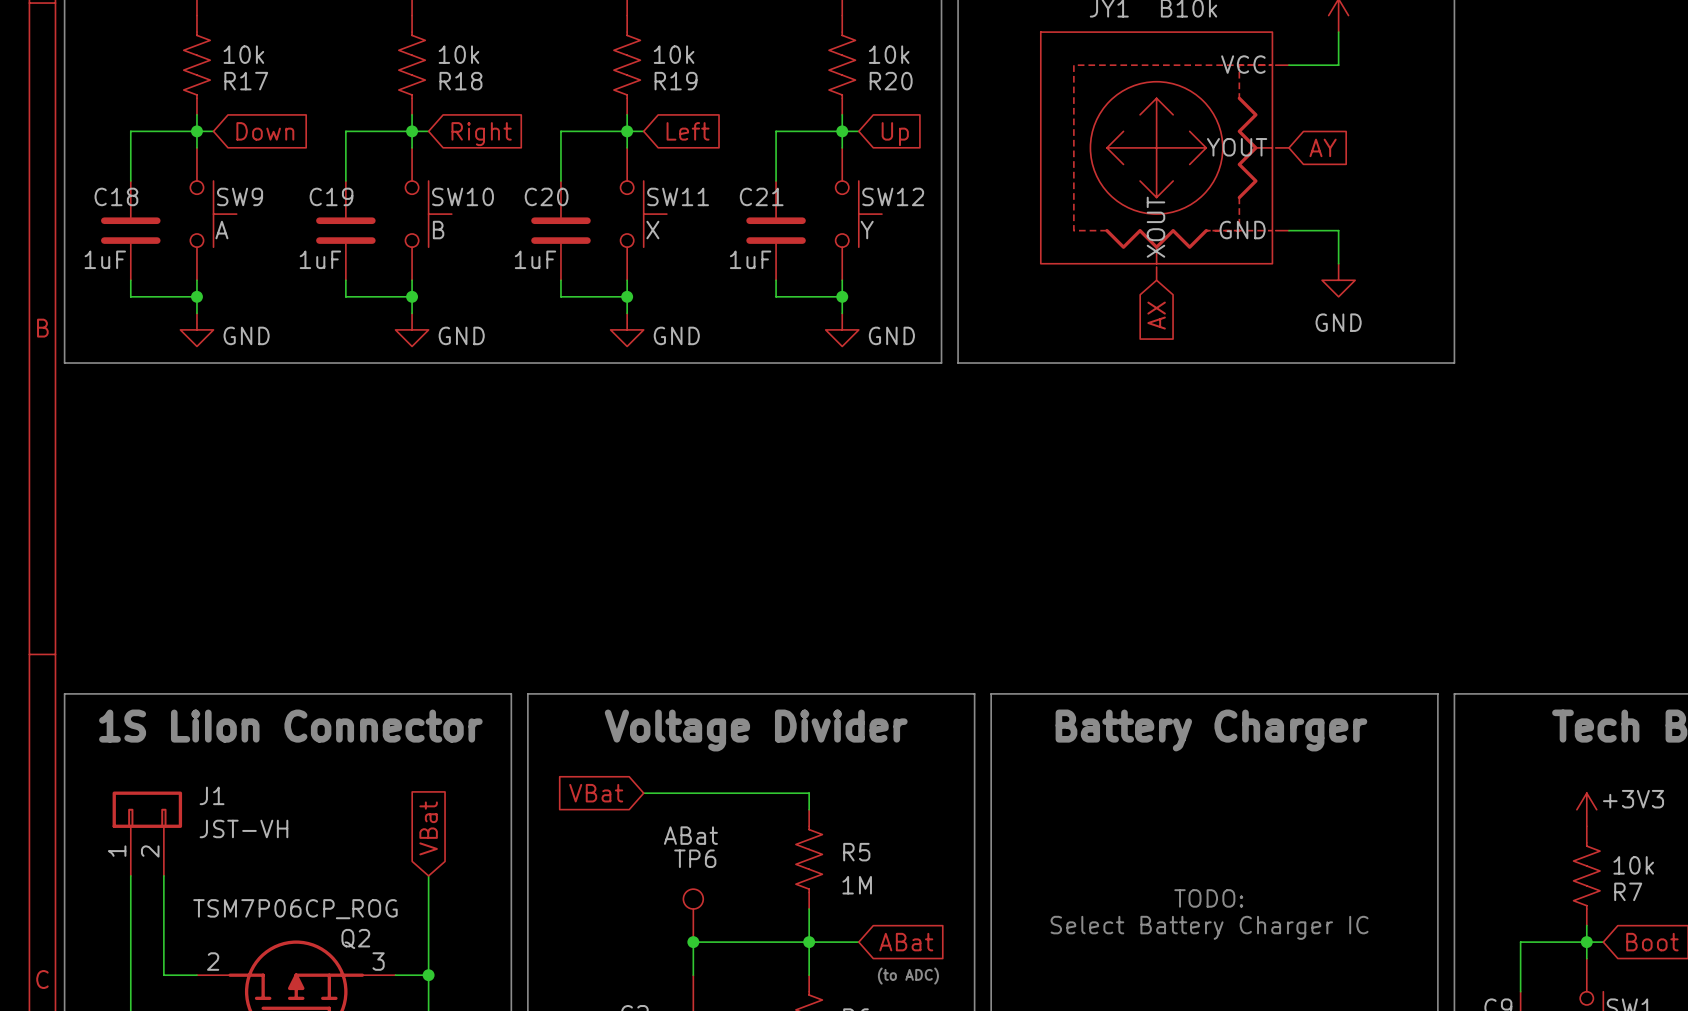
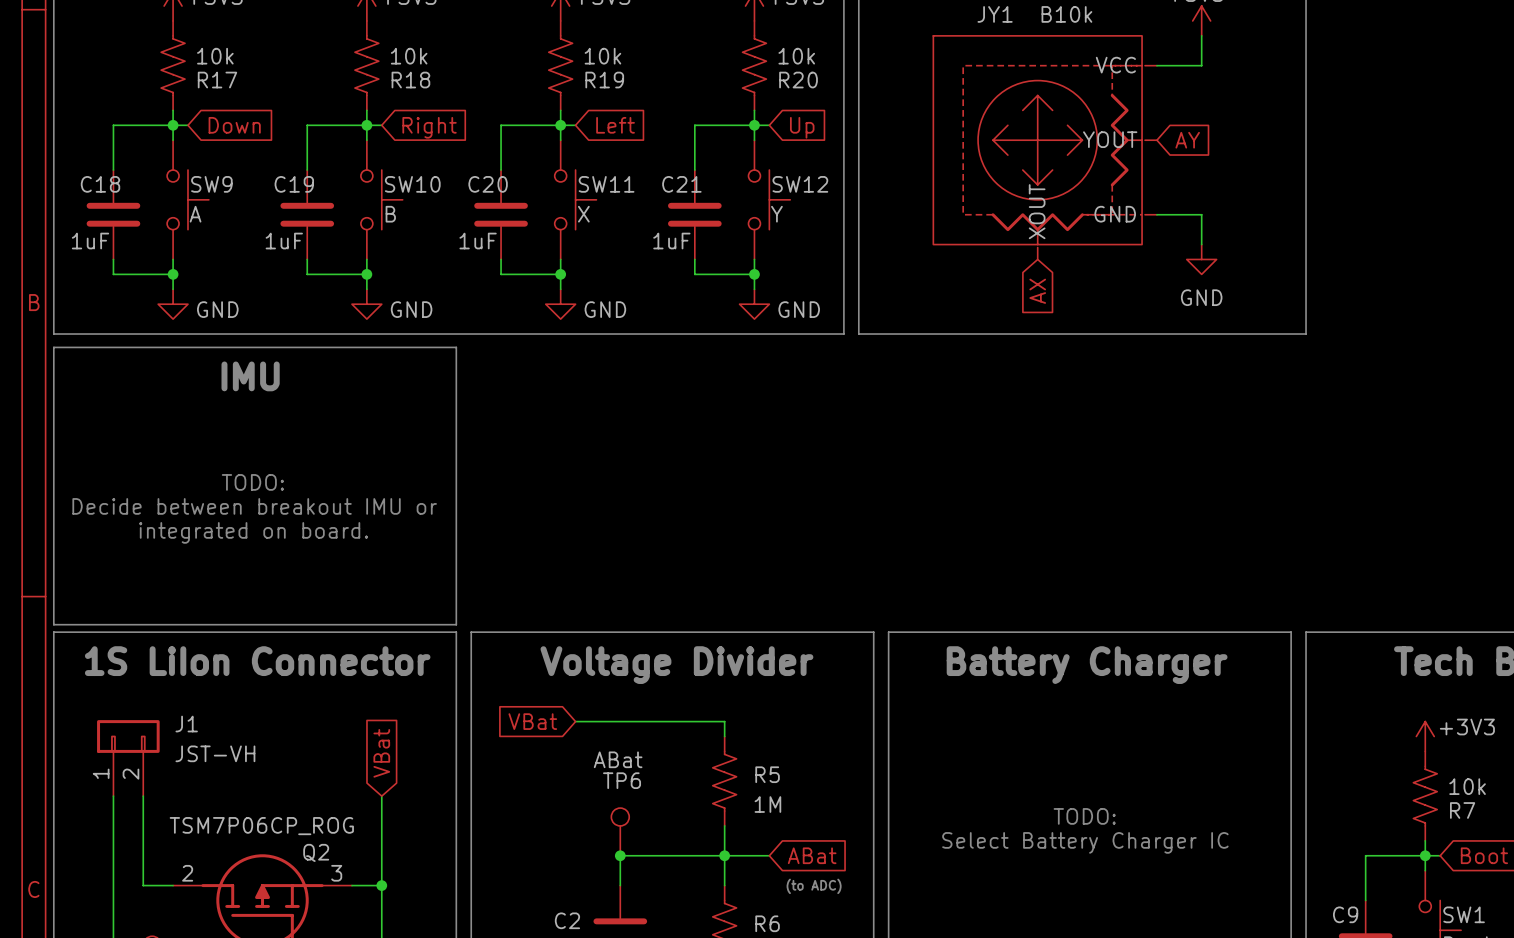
line: none -> (53, 347) (456, 347) (456, 624) (53, 624) (53, 347)
text: none -> IMU (250, 376)
text: none -> TODO: (252, 482)
text: none -> Decide between breakout IMU or (254, 506)
text: none -> integrated on board. (253, 532)

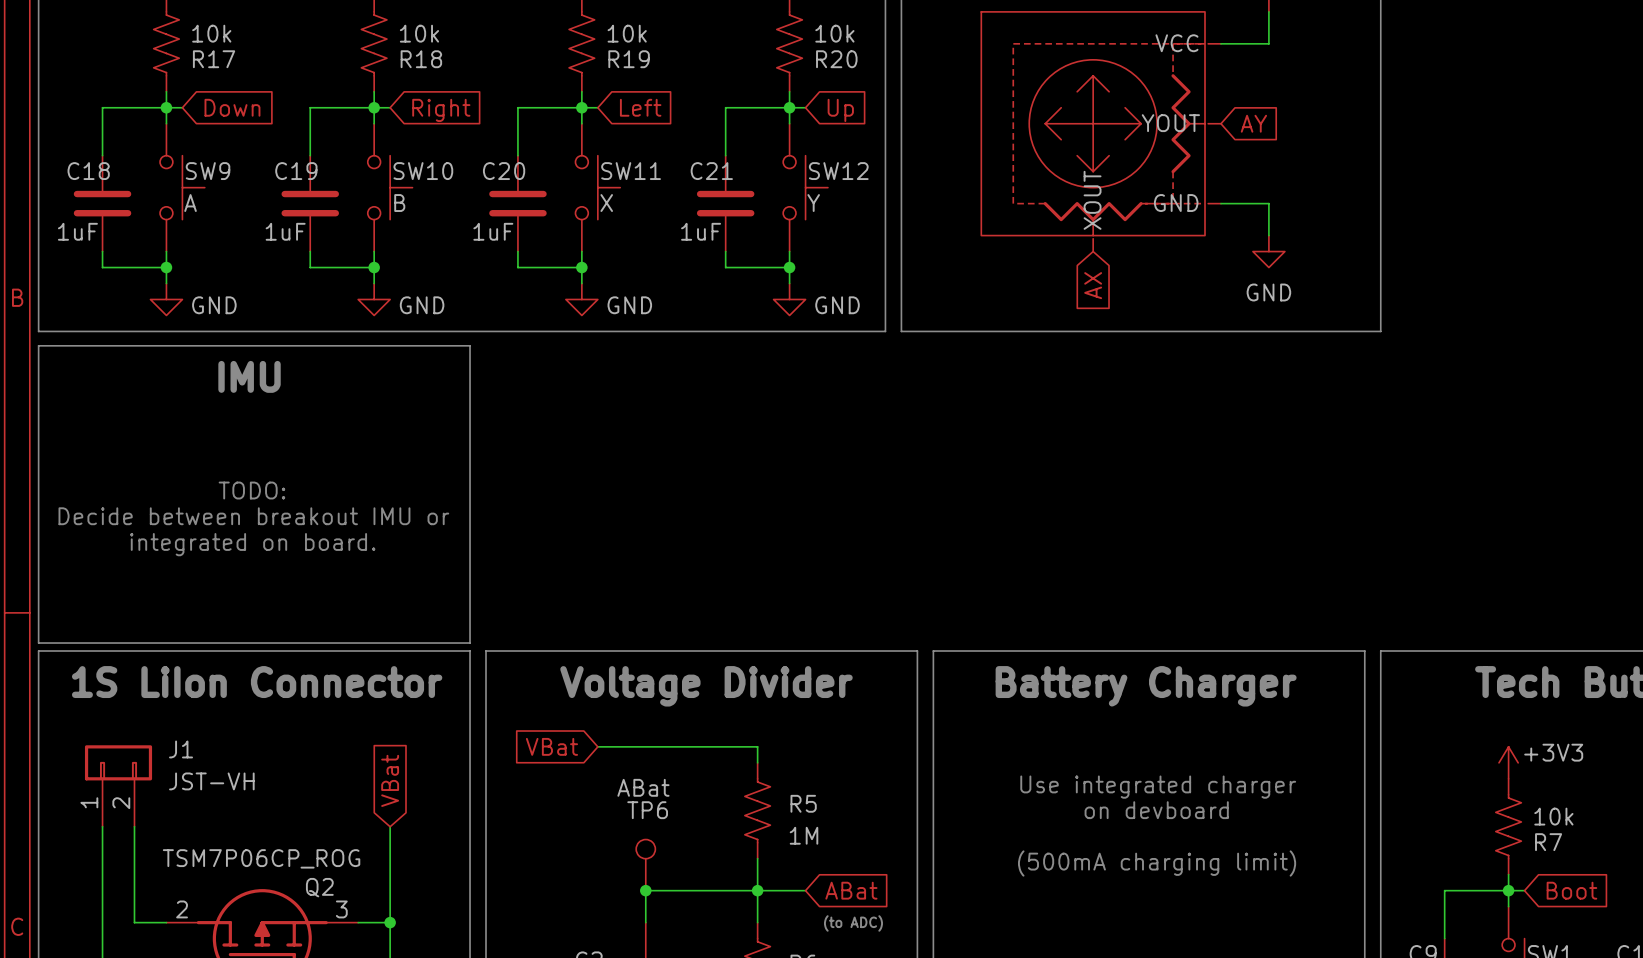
text: none -> Use integrated charger (1158, 787)
text: none -> on devboard (1156, 810)
text: TODO: (1084, 816) -> none
text: none -> (500mA charging limit) (1157, 863)
text: Select Battery Charger IC (1085, 842) -> none

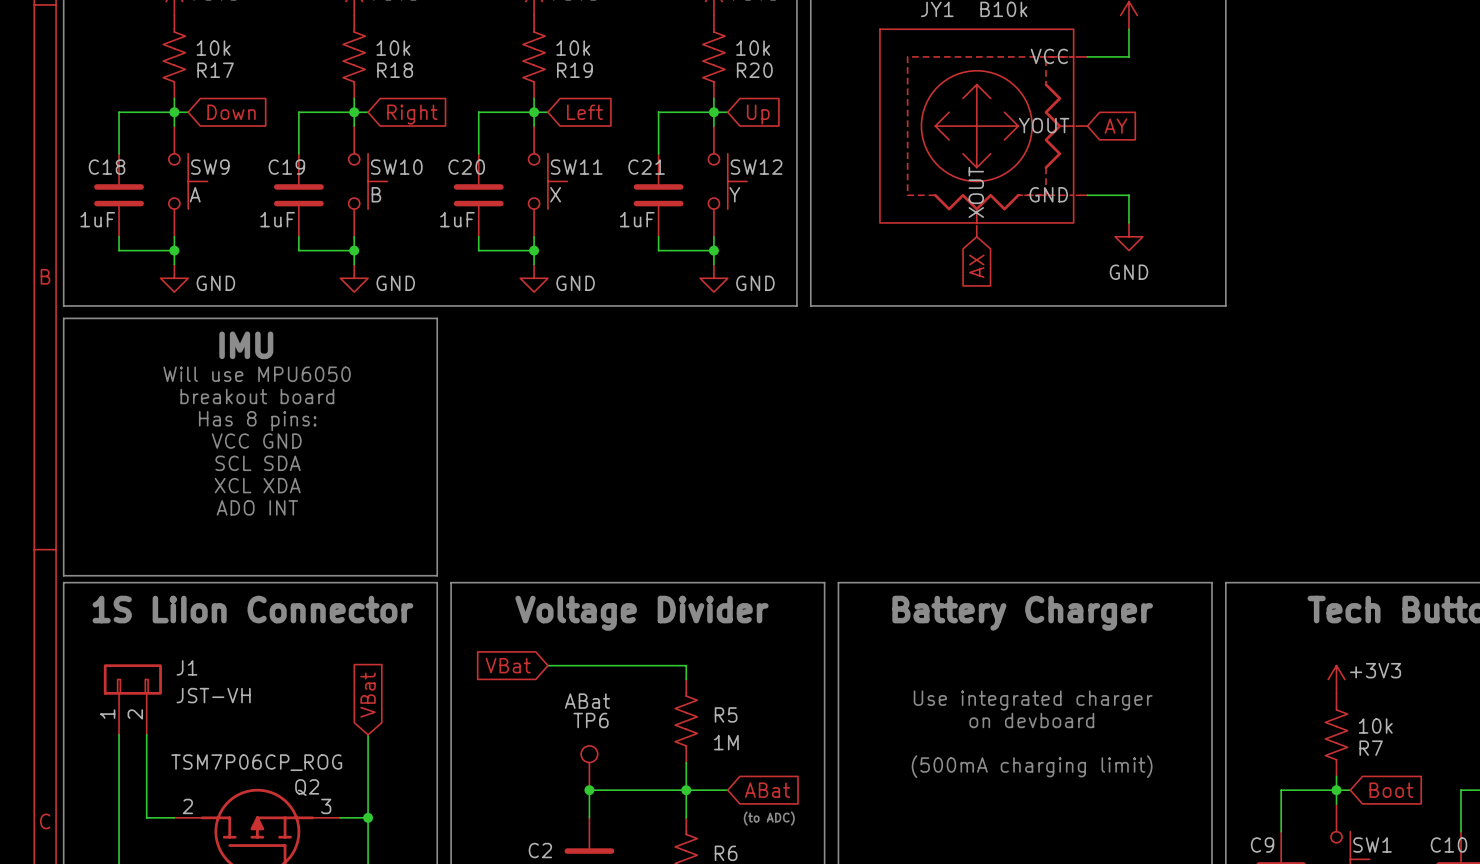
text: none -> Will use MPU6050 (257, 374)
text: none -> breakout board (257, 396)
text: none -> Has 8 pins: (257, 421)
text: TODO: (251, 490) -> VCC GND (256, 441)
text: Decide between breakout IMU or (253, 516) -> SCL SDA (258, 463)
text: integrated on board. (252, 544) -> XCL XDA (257, 485)
text: none -> ADO INT (257, 507)

